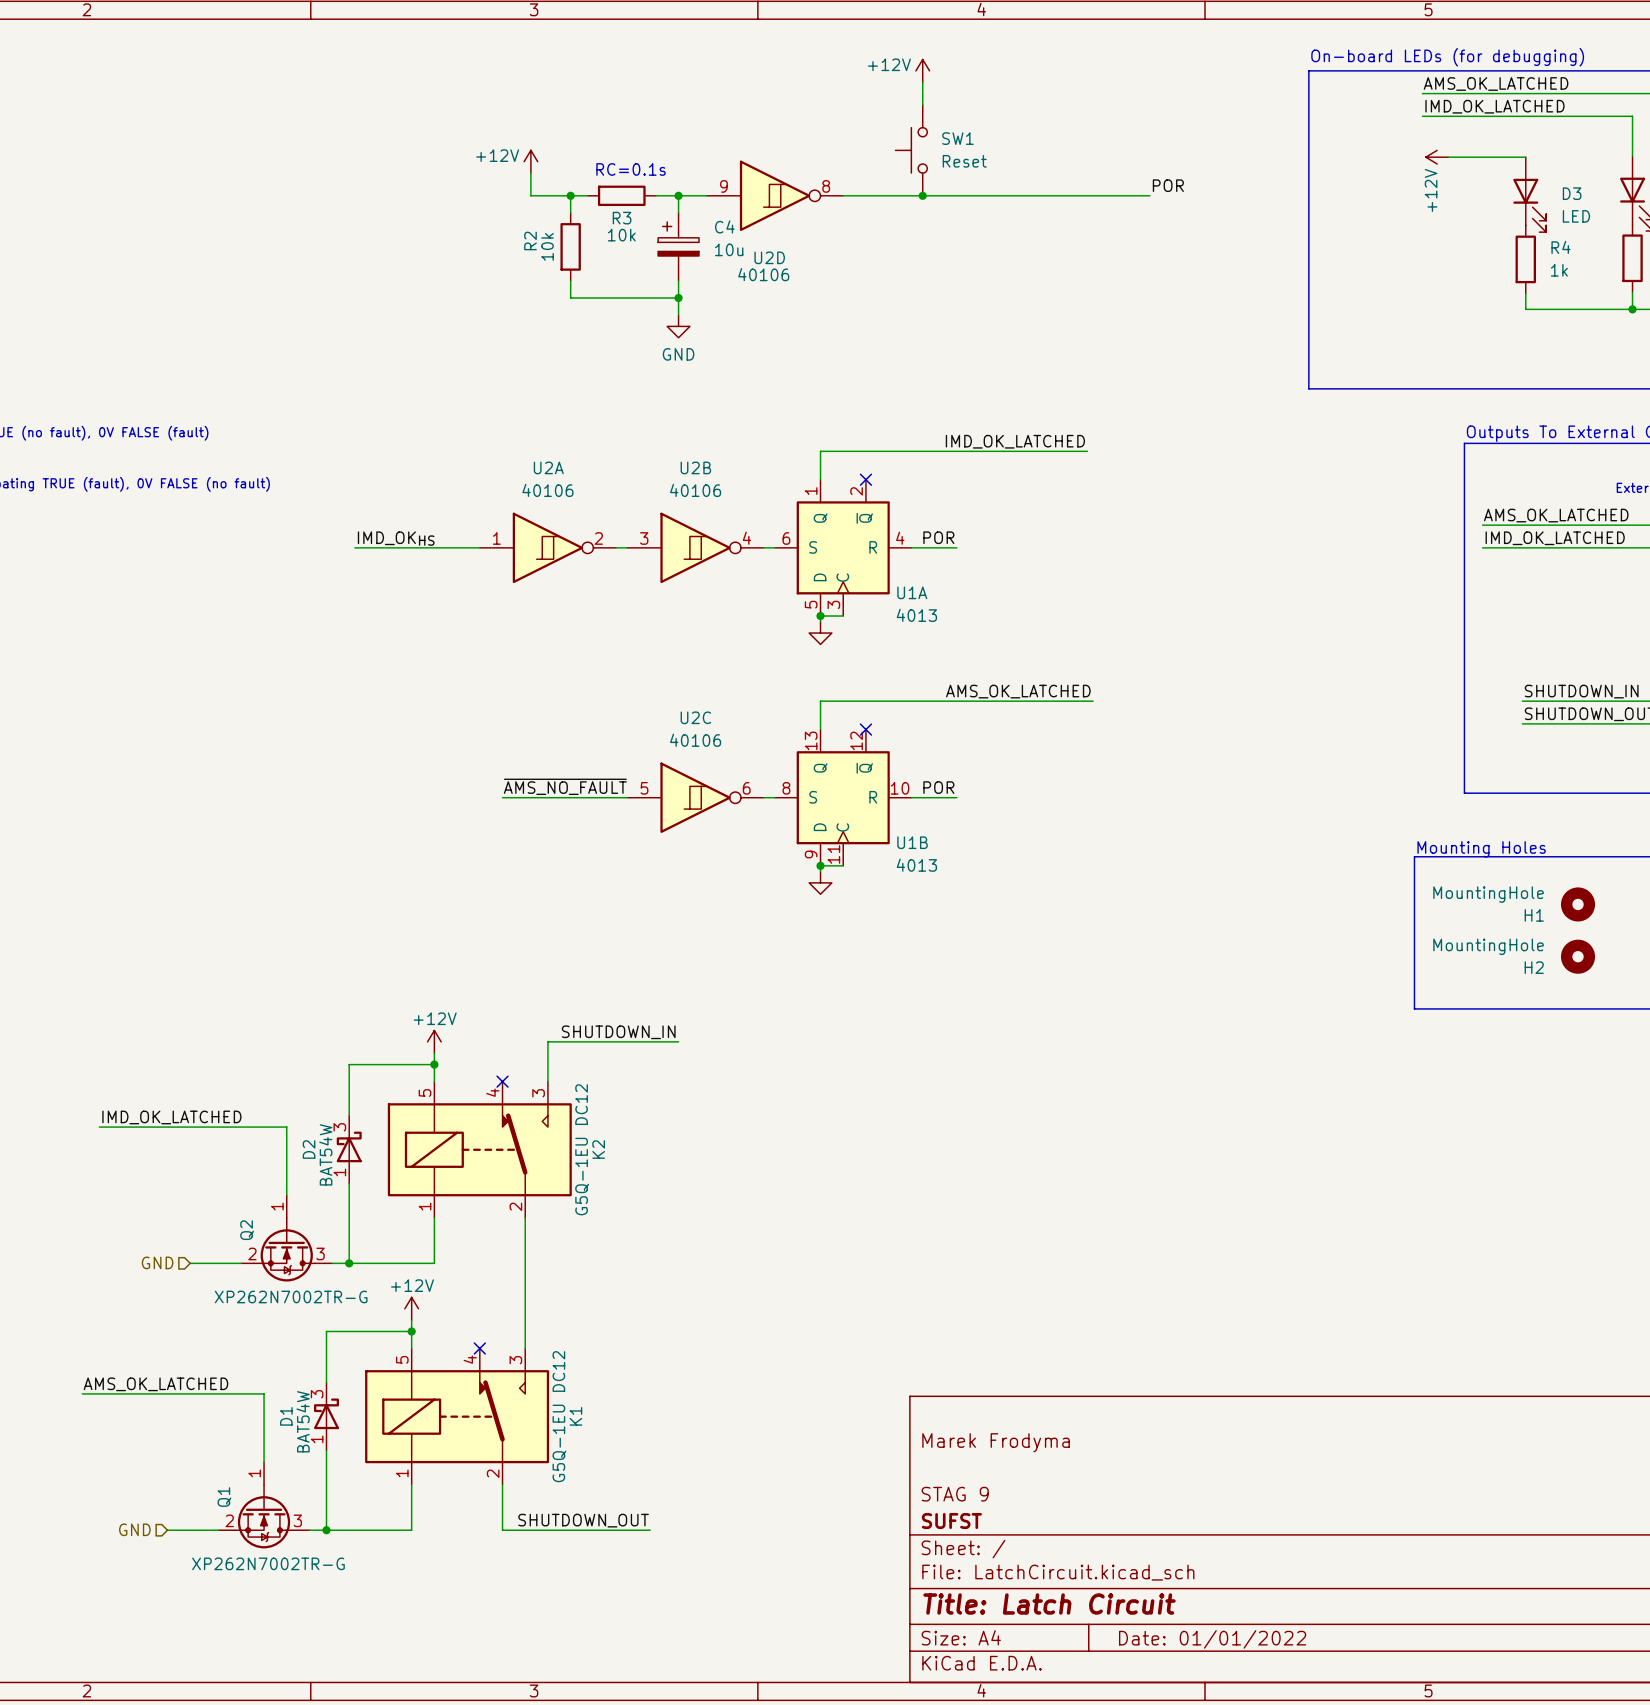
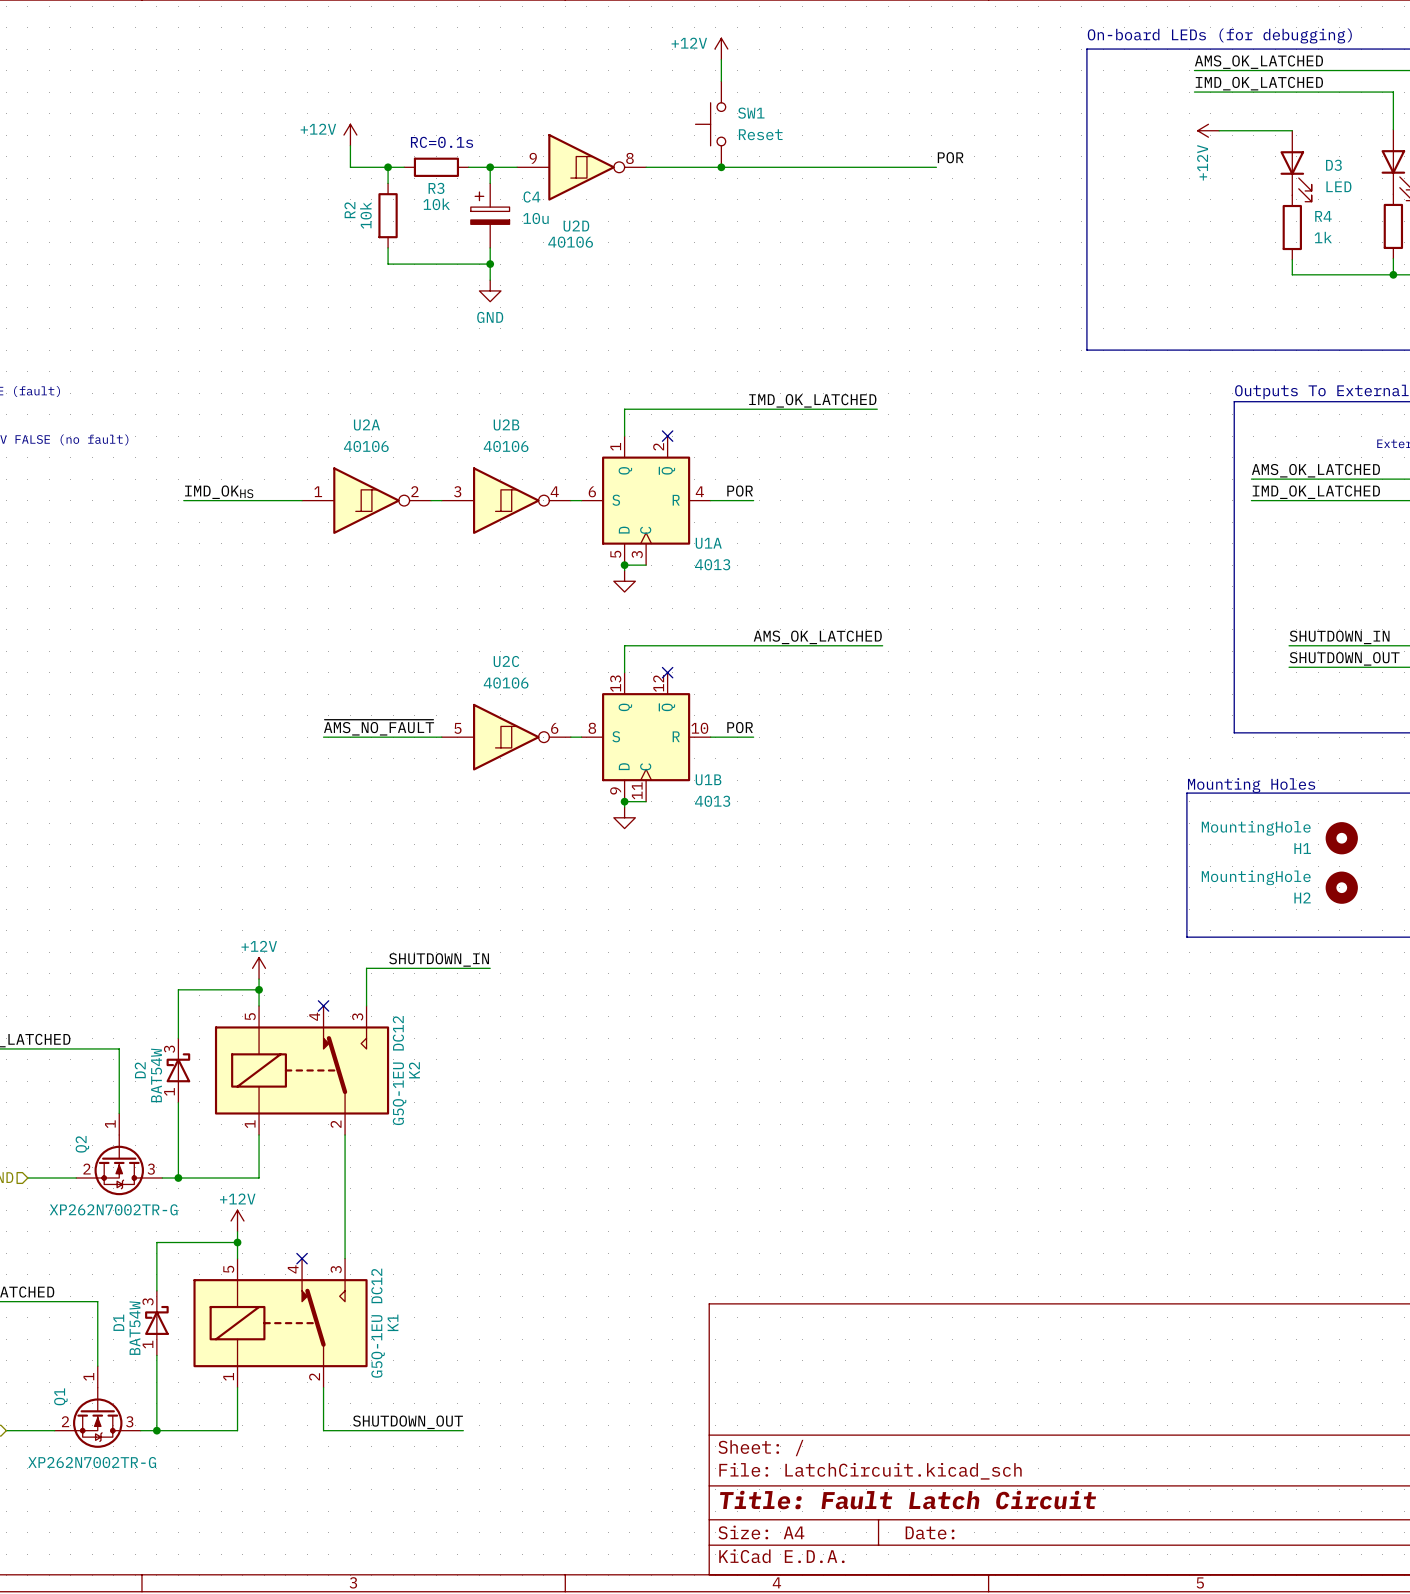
title block: Marek Frodyma (996, 1442) -> none
title block: STAG 9 (955, 1494) -> none
title block: SUFST (951, 1521) -> none
title block: Title: Latch Circuit (1049, 1604) -> Title: Fault Latch Circuit (908, 1500)
title block: Date: 01/01/2022 (1212, 1639) -> Date: (930, 1532)

